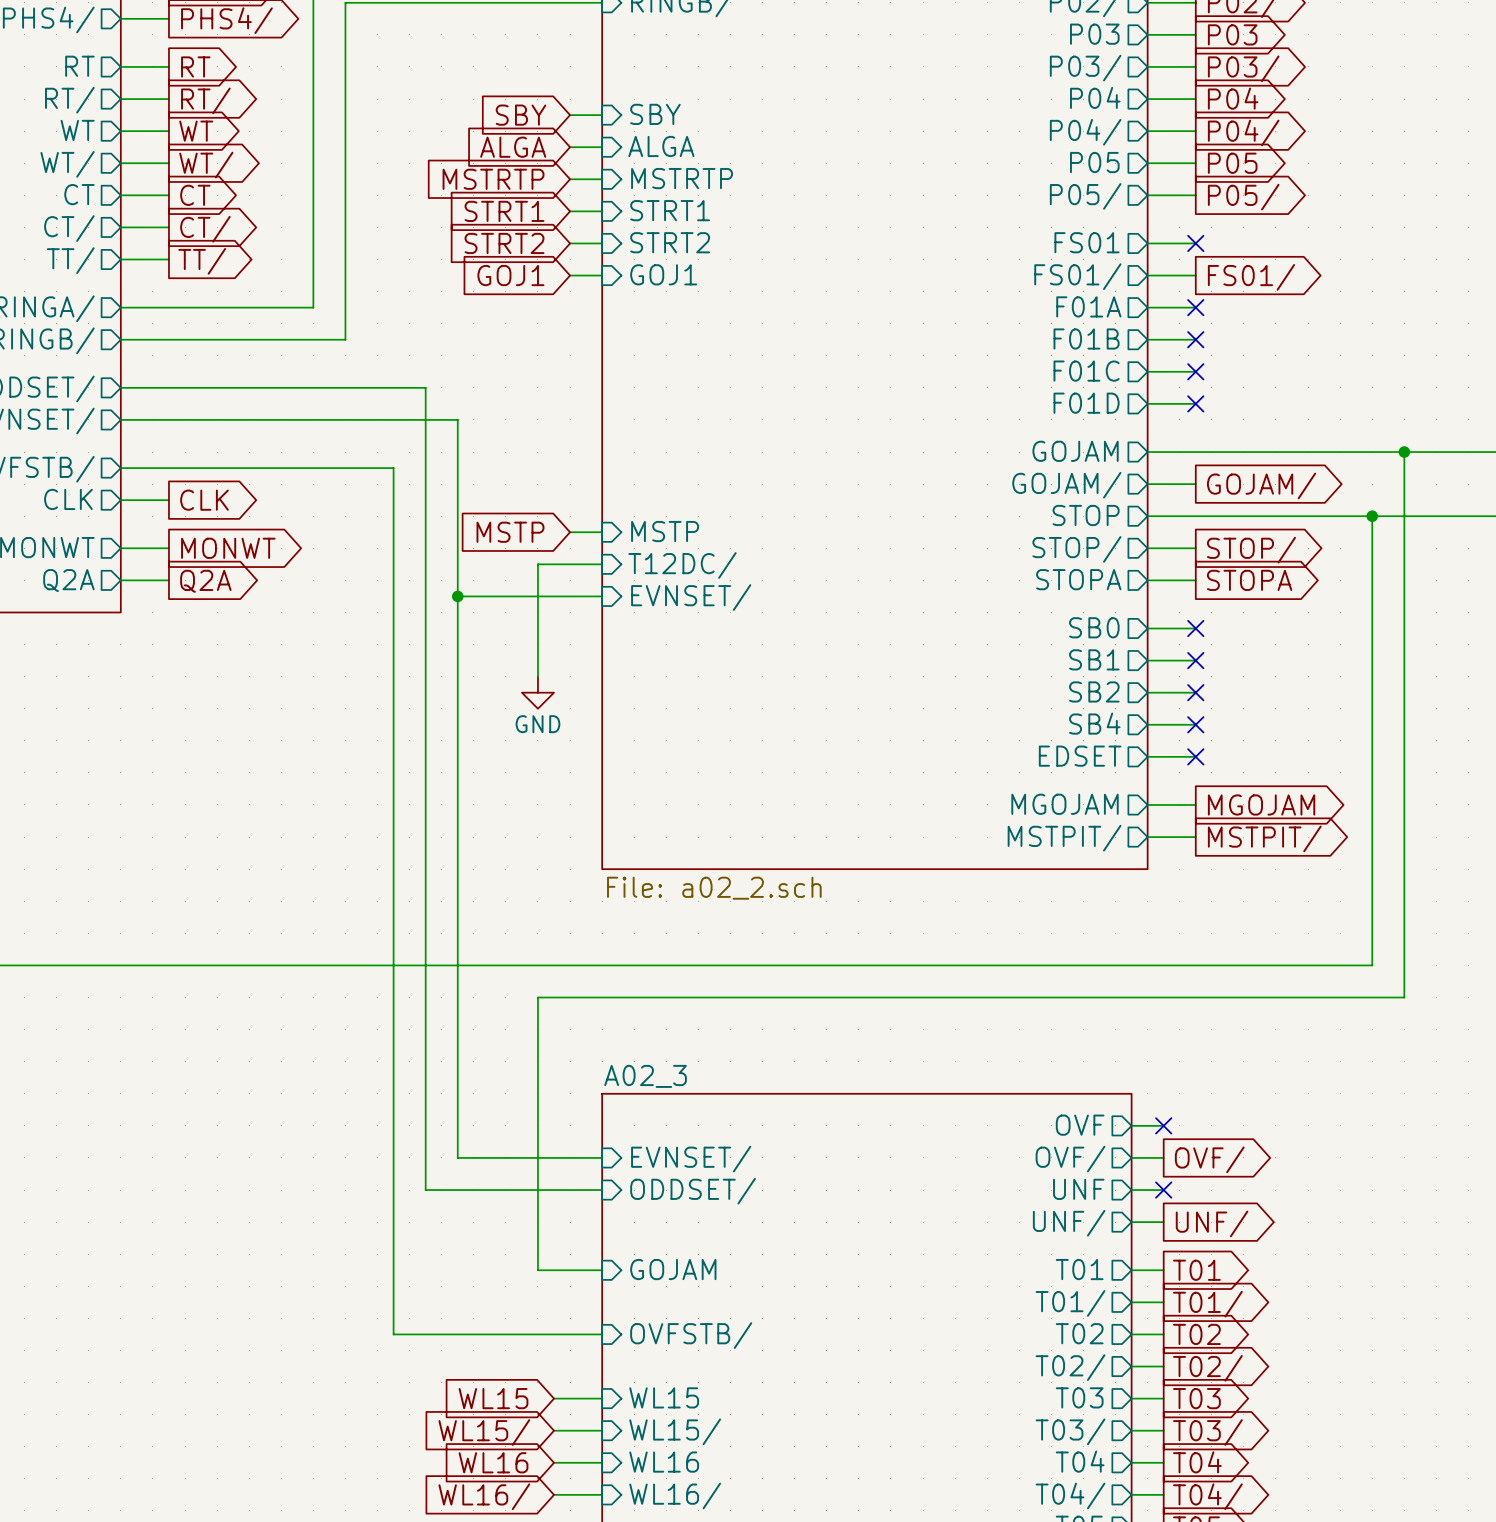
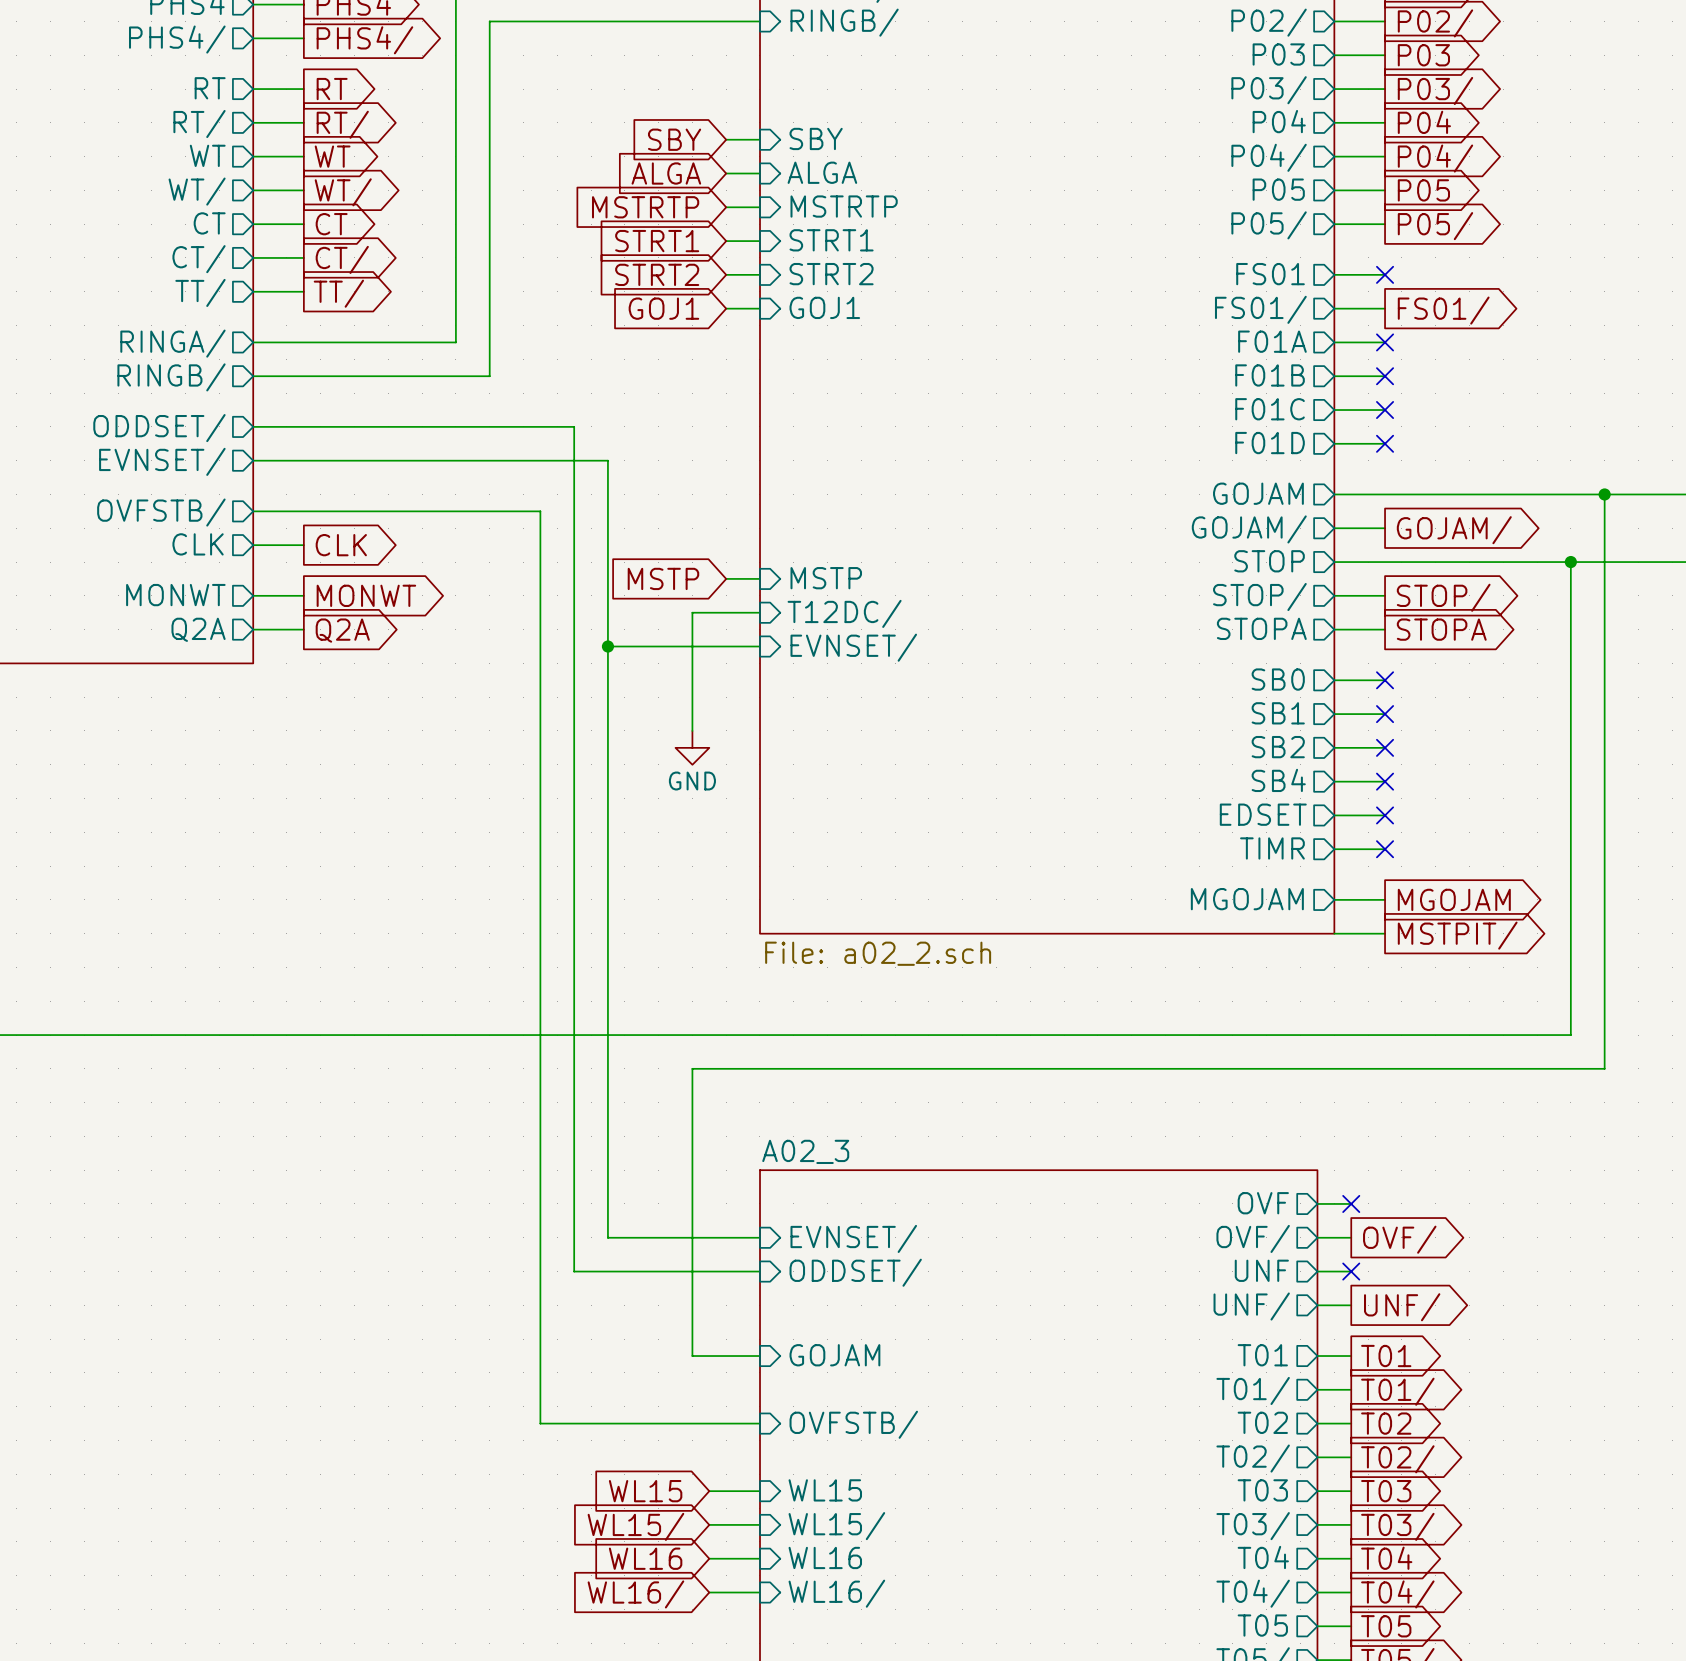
sheet pin: none -> TIMR (1272, 848)
no-connect mark: none -> (1385, 849)
sheet pin: MGOJAM (1065, 804) -> none
wire: (1147, 804) (1195, 804) -> (1334, 849) (1385, 849)
global label: MGOJAM (1261, 804) -> none
sheet pin: MSTPIT/ (1064, 838) -> MGOJAM (1247, 899)
global label: MSTPIT/ (1264, 838) -> MGOJAM (1454, 899)
wire: none -> (1334, 933) (1385, 933)
global label: none -> MSTPIT/ (1457, 935)

